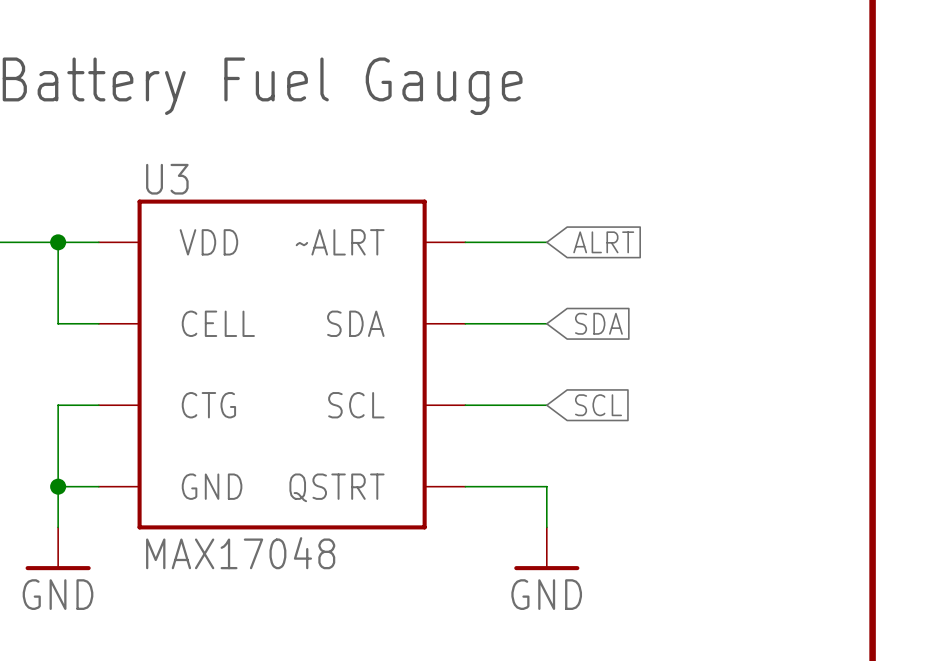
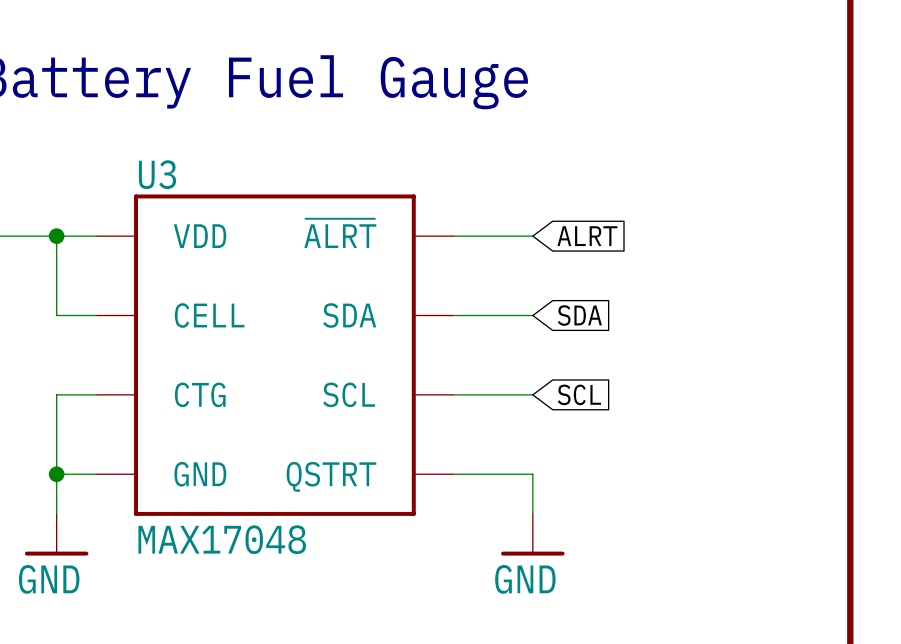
U3 pin name: ~ALRT (340, 242) -> ~{ALRT} (340, 233)

